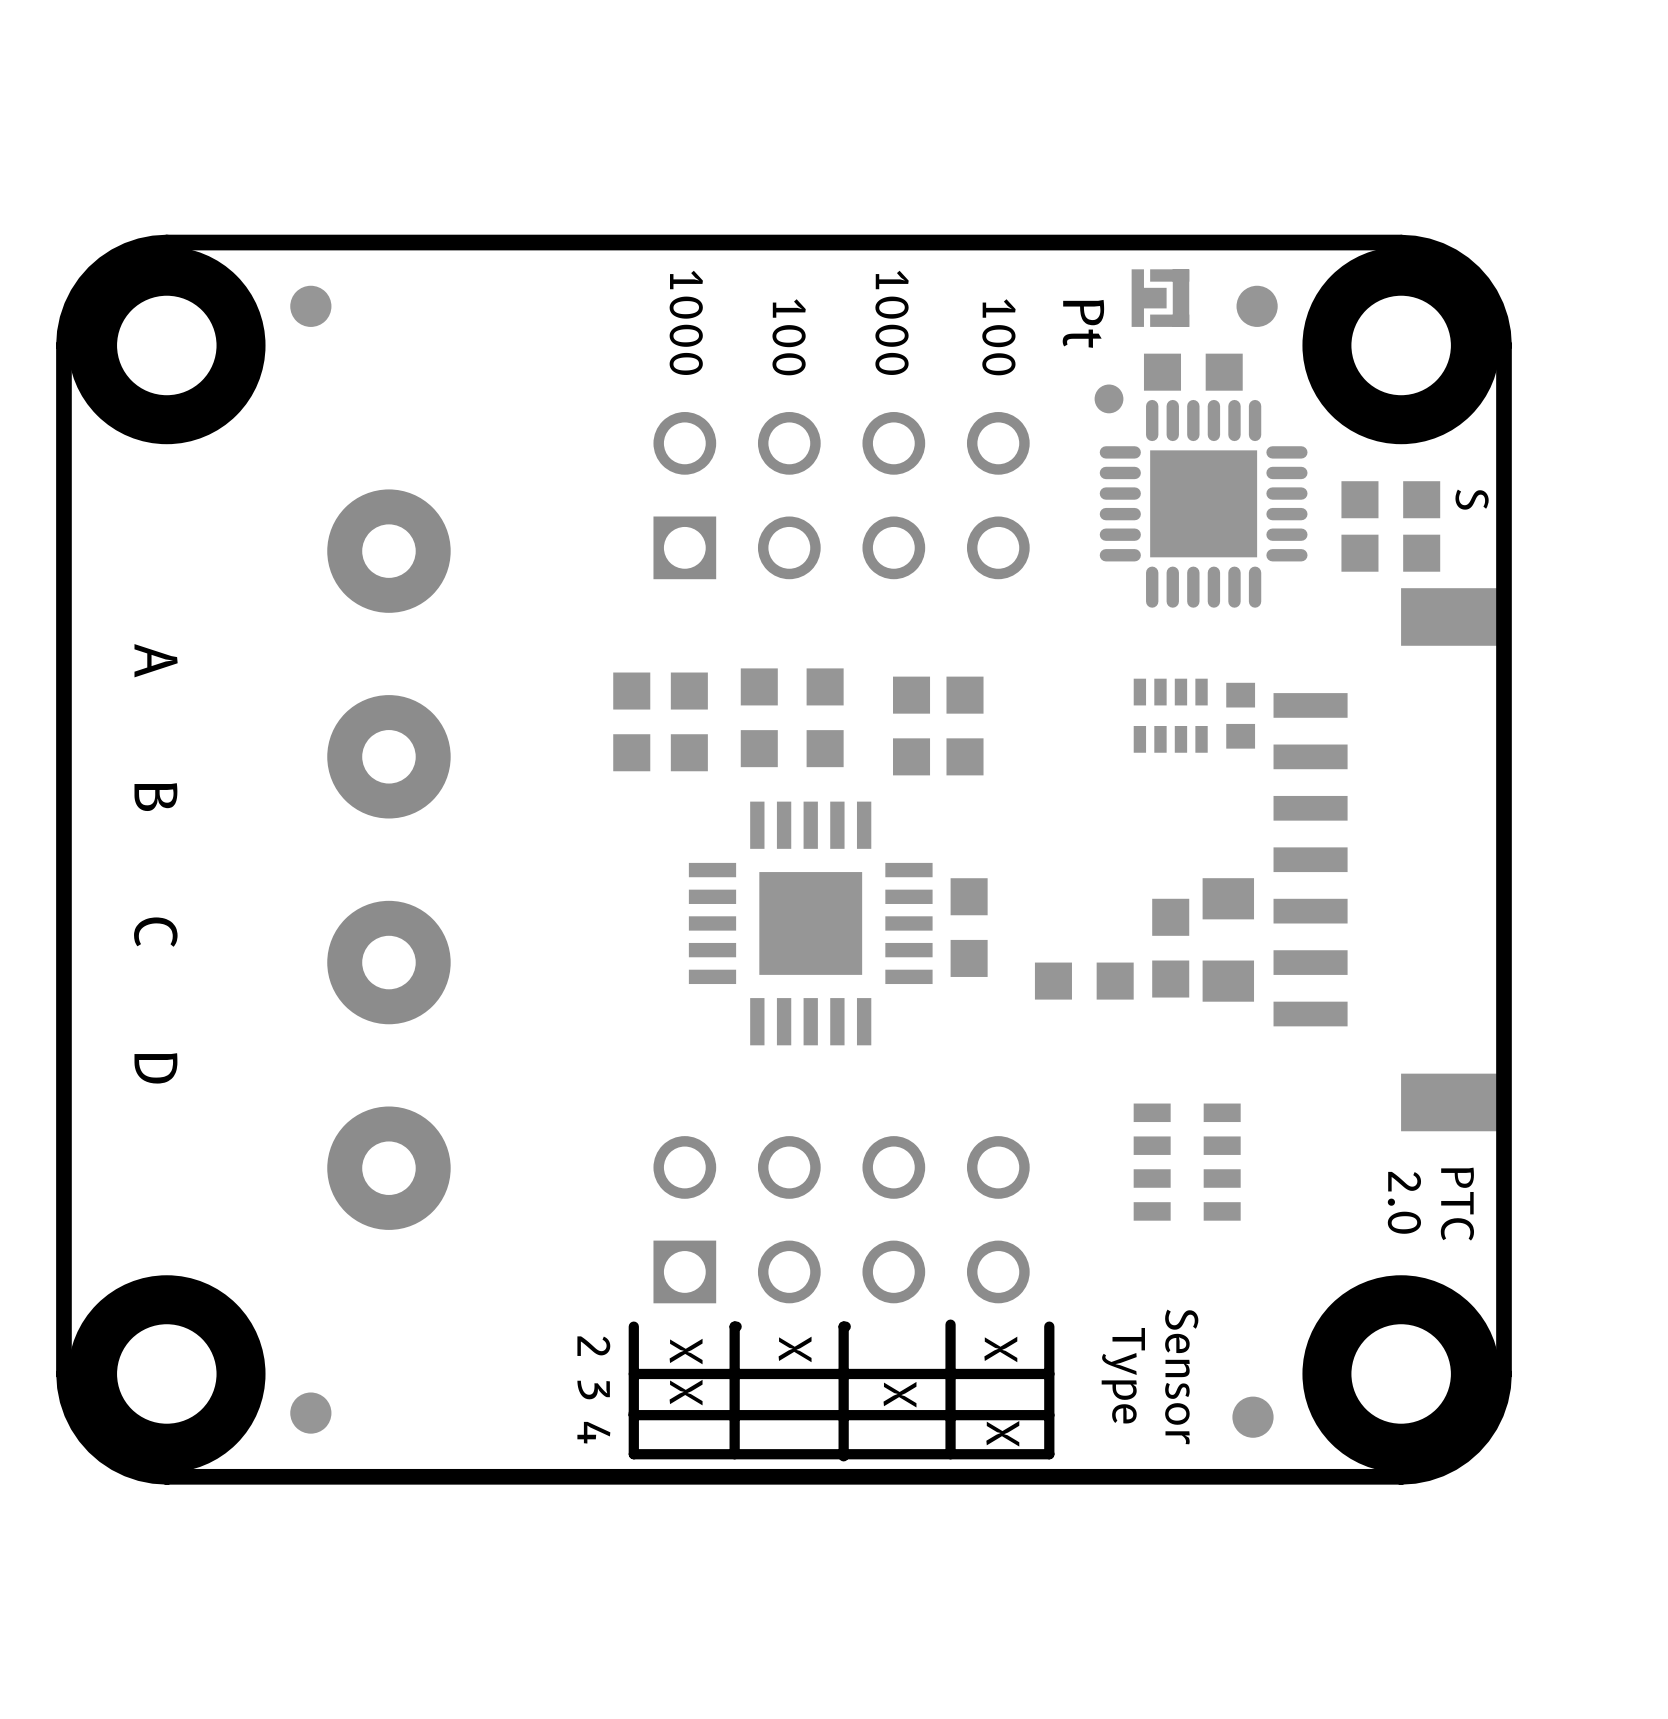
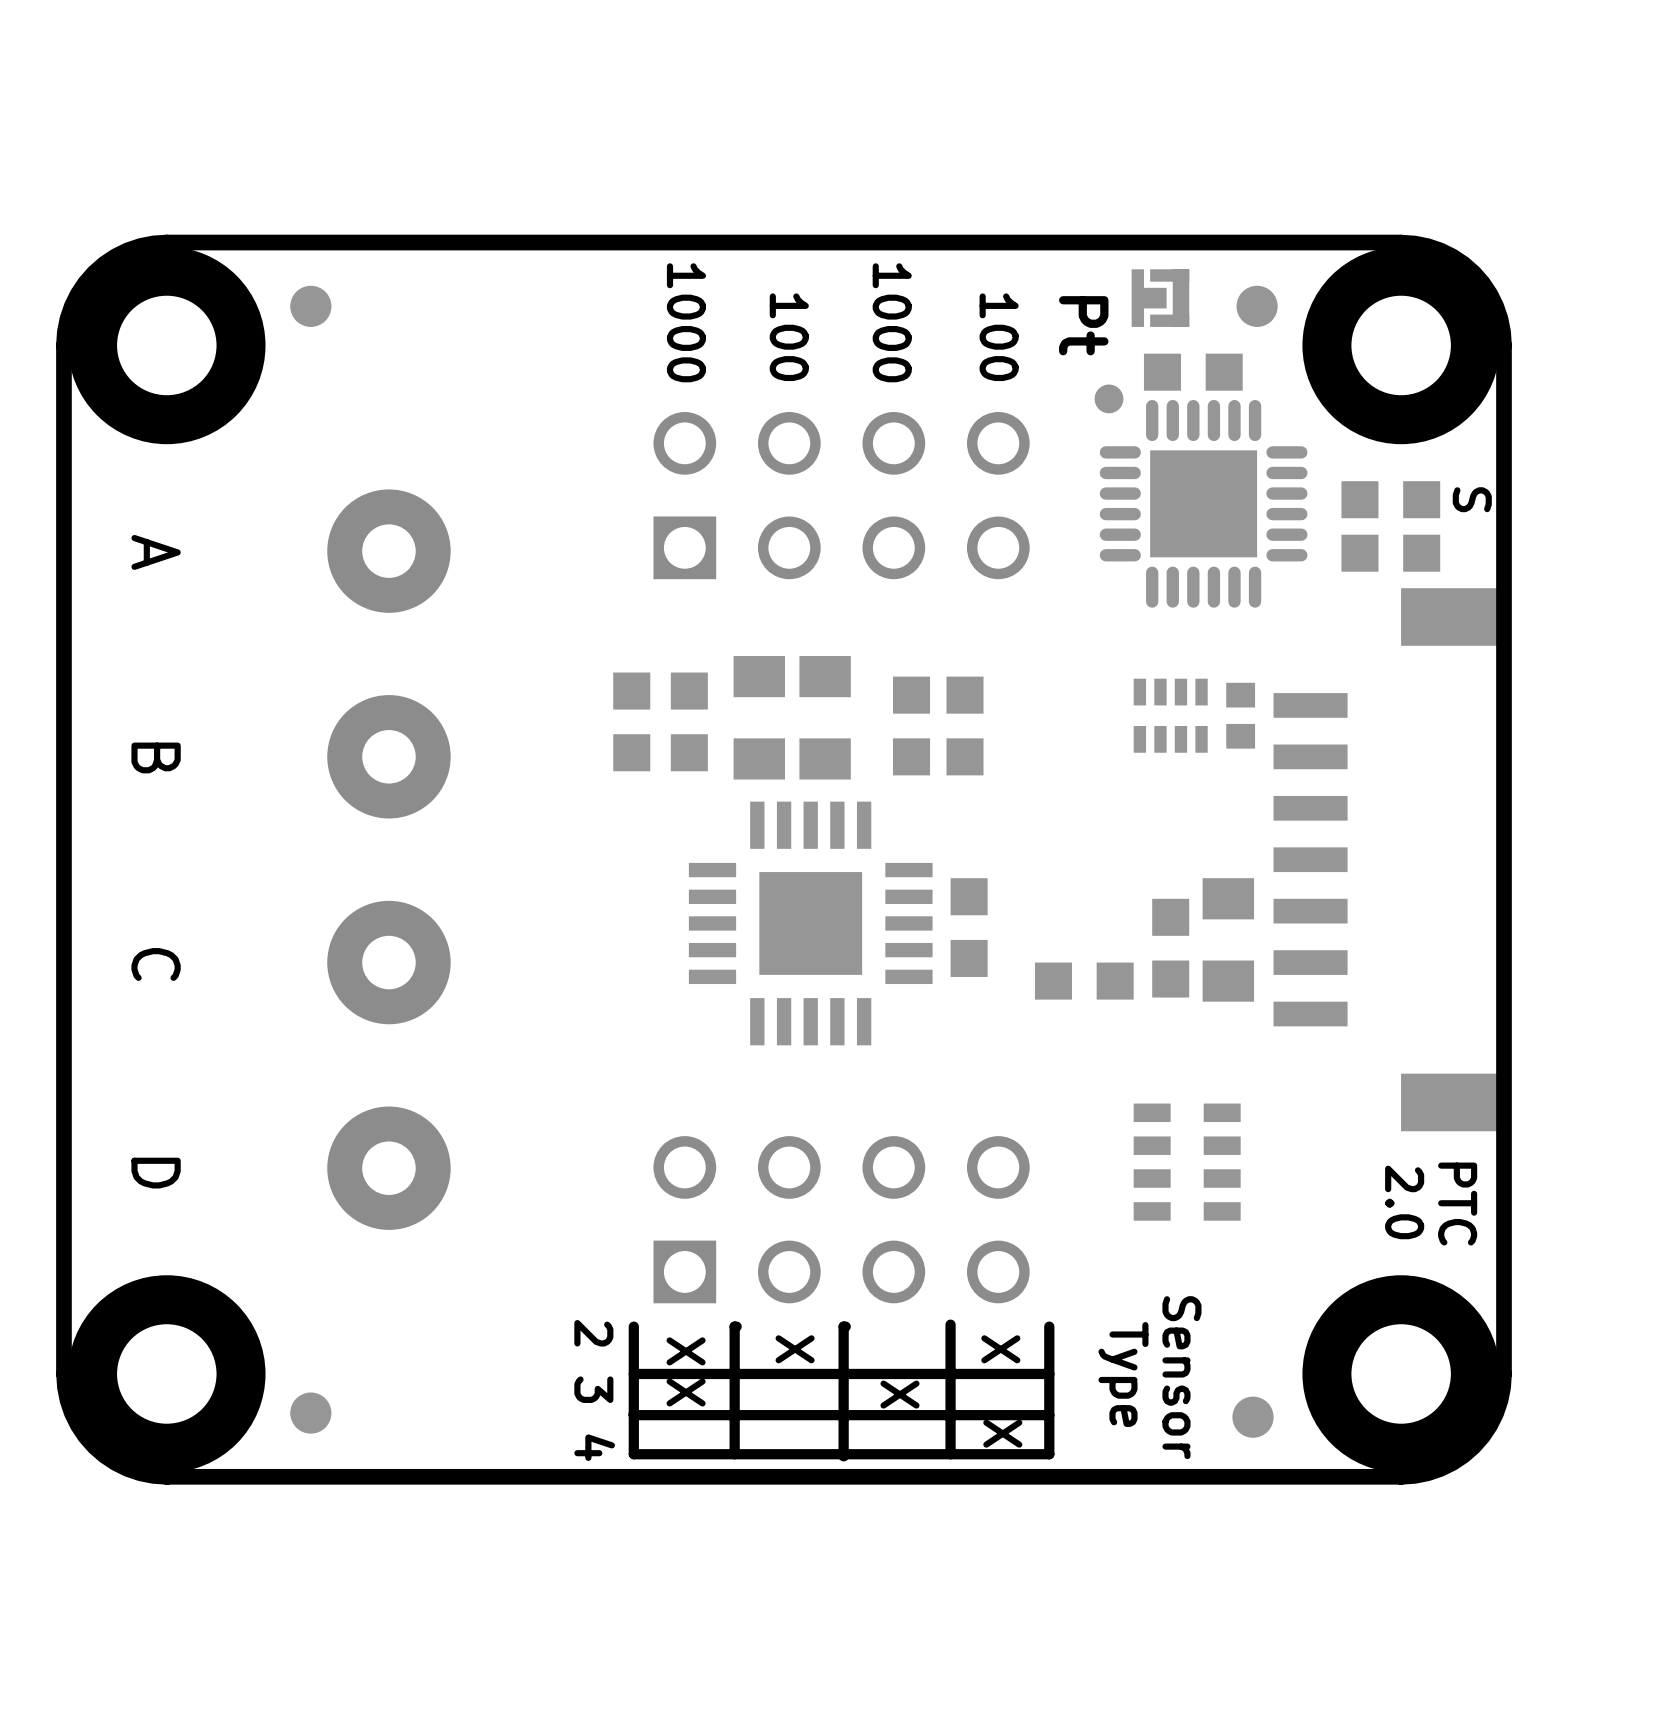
part footprint: [740, 668, 778, 768] -> [733, 656, 786, 780]
part footprint: [806, 668, 844, 768] -> [799, 656, 851, 780]

